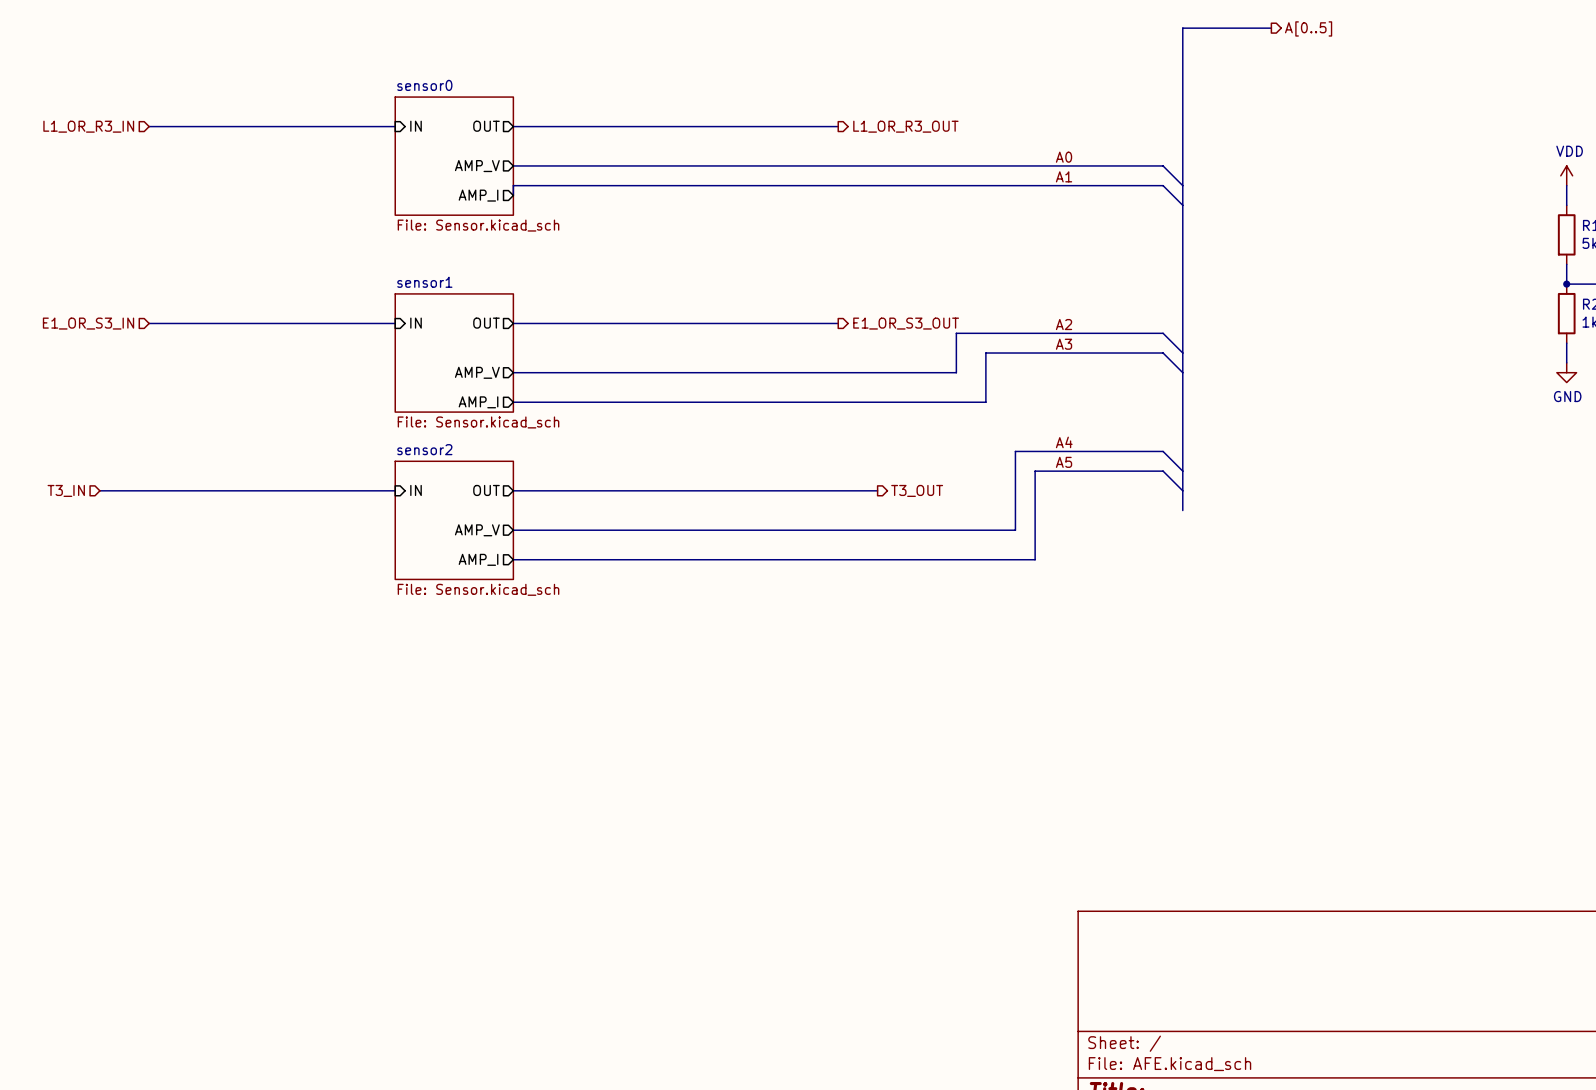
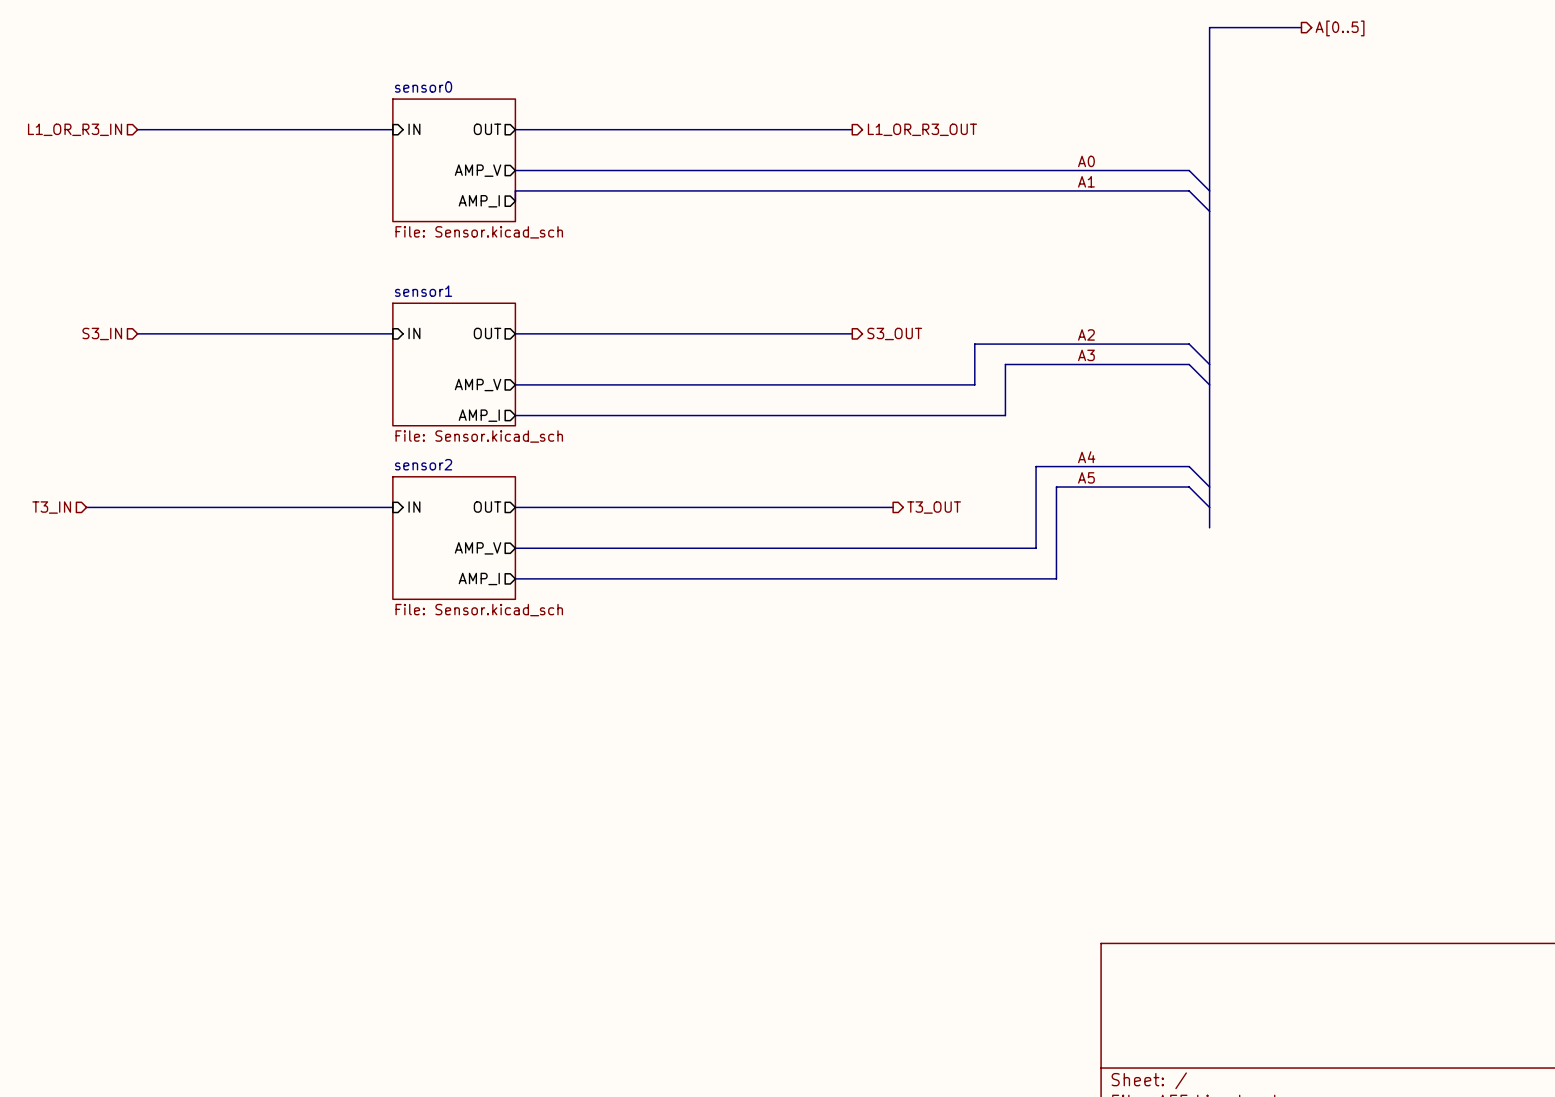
hierarchical label: E1_OR_S3_IN (88, 323) -> S3_IN (102, 333)
hierarchical label: E1_OR_S3_OUT (906, 323) -> S3_OUT (894, 333)

